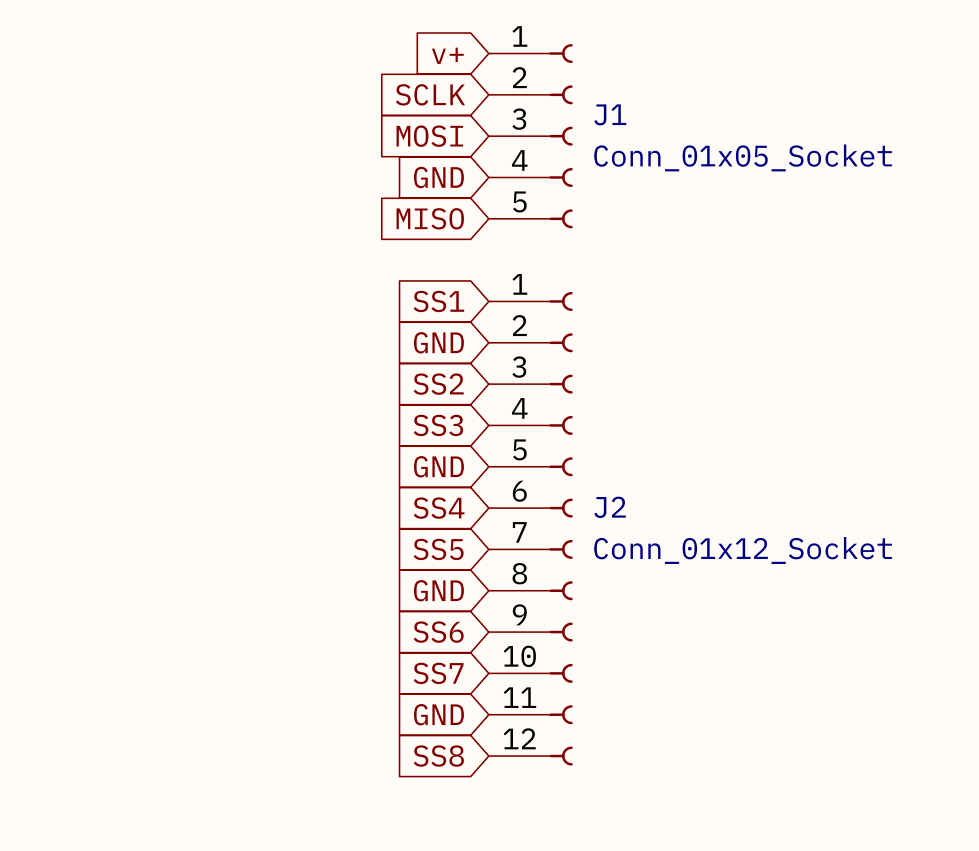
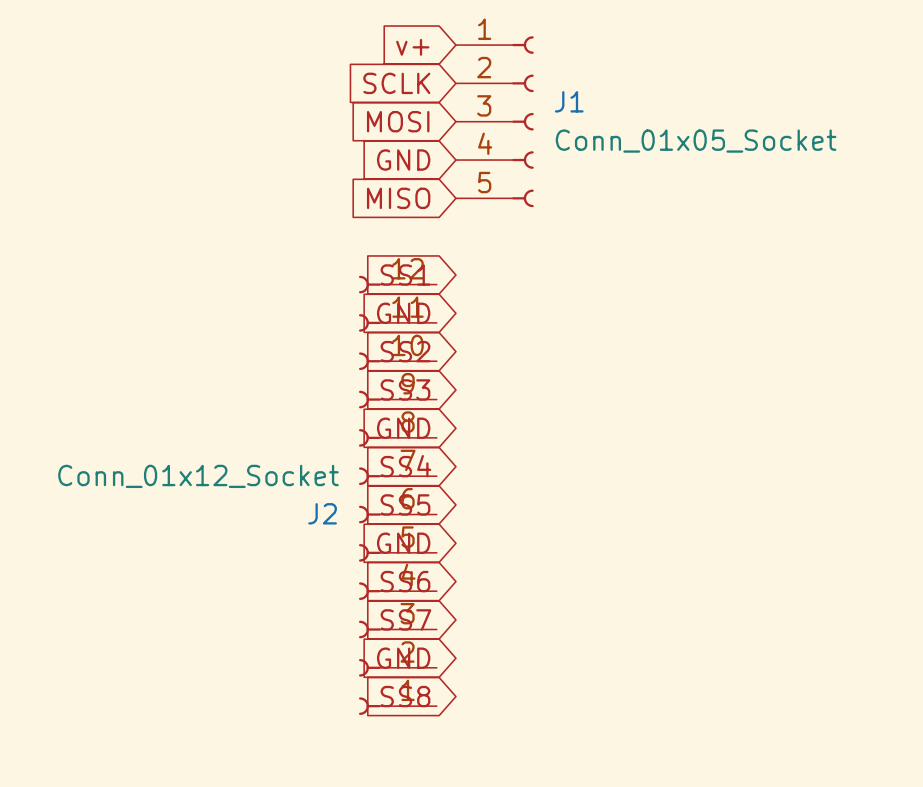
J2 rotation: 0° (561, 528) -> 180° (369, 495)

